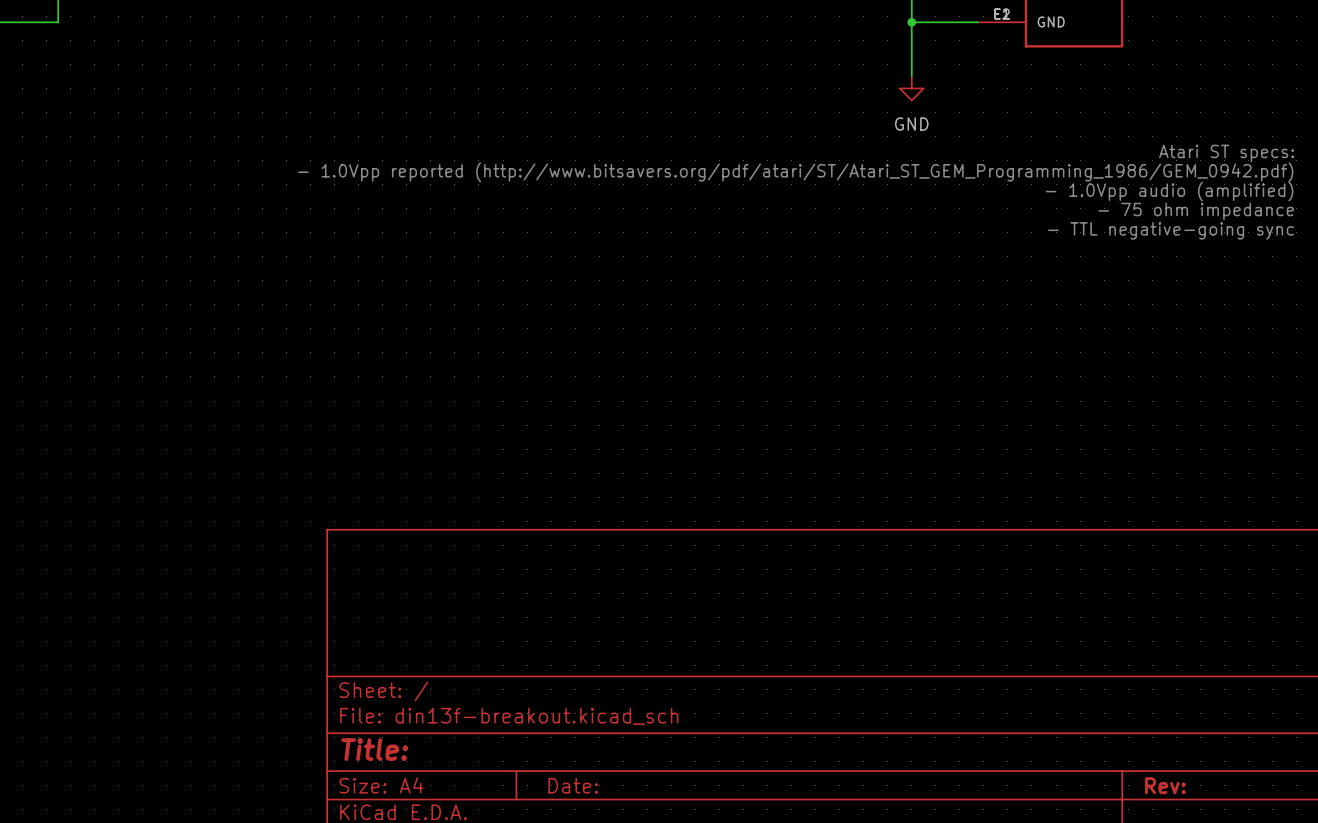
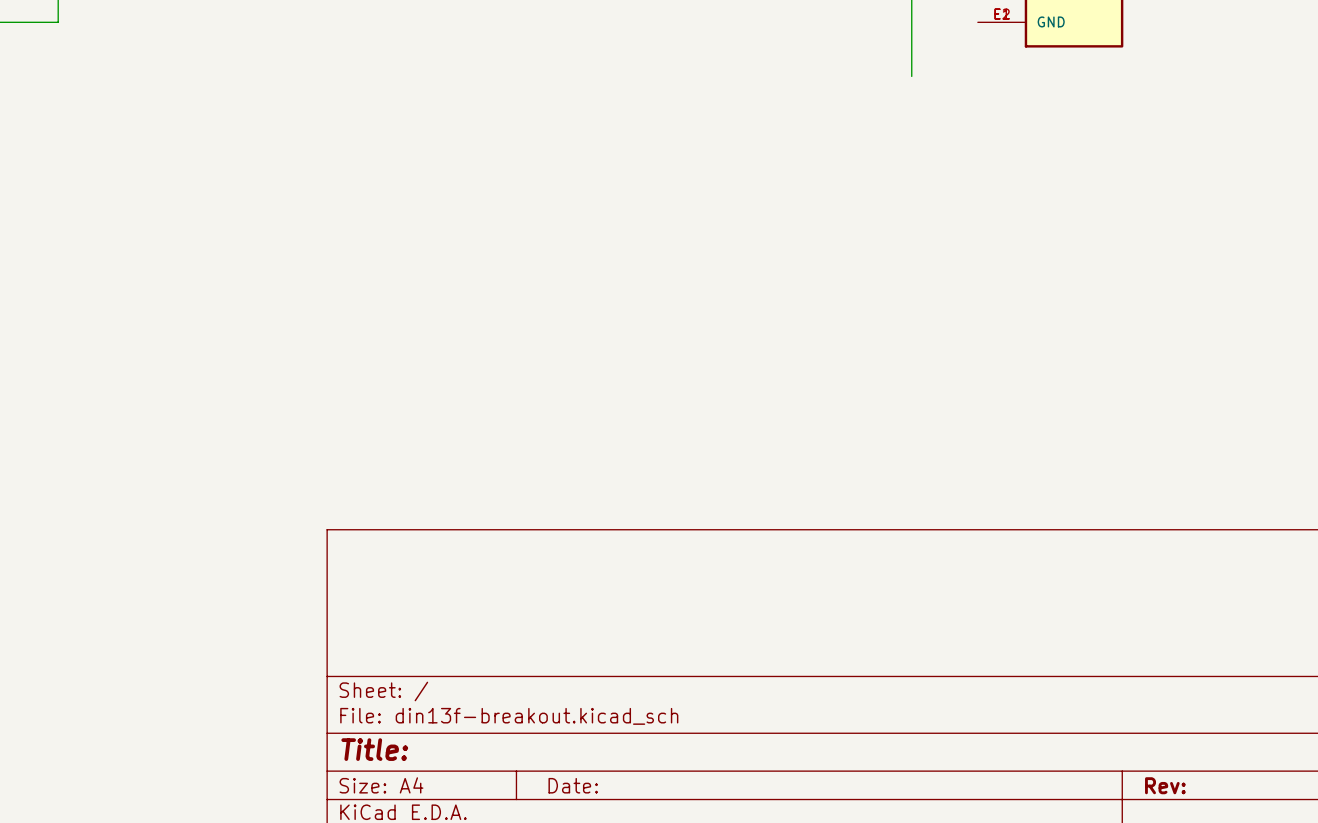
wire: (911, 22) (977, 22) -> none
junction: (911, 22) -> none
power symbol: GND (911, 88) -> none
text: Atari ST specs: (1226, 153) -> none
text: - 1.0Vpp reported (http://www.bitsavers.org/pdf/atari/ST/Atari_ST_GEM_Programming_1986/GEM_0942.pdf) (795, 172) -> none
text: - 1.0Vpp audio (amplified) (1169, 191) -> none
text: - 75 ohm impedance (1196, 211) -> none
text: - TTL negative-going sync (1170, 230) -> none

